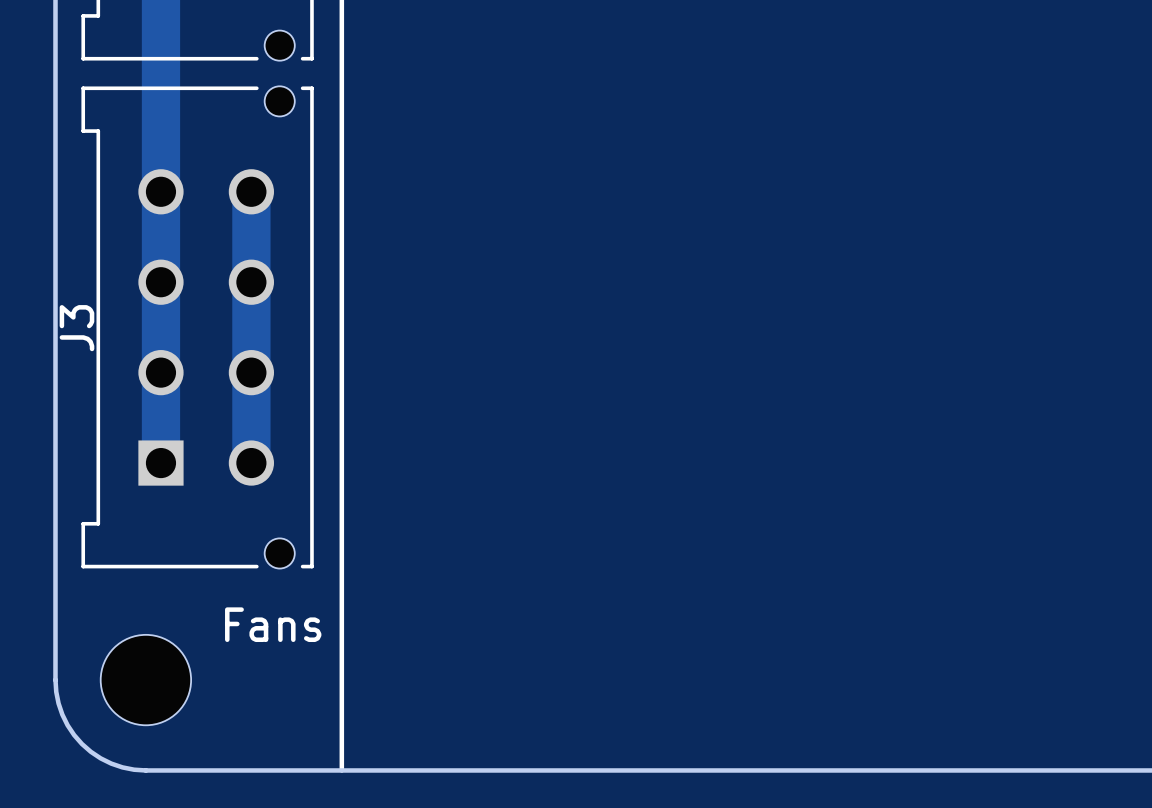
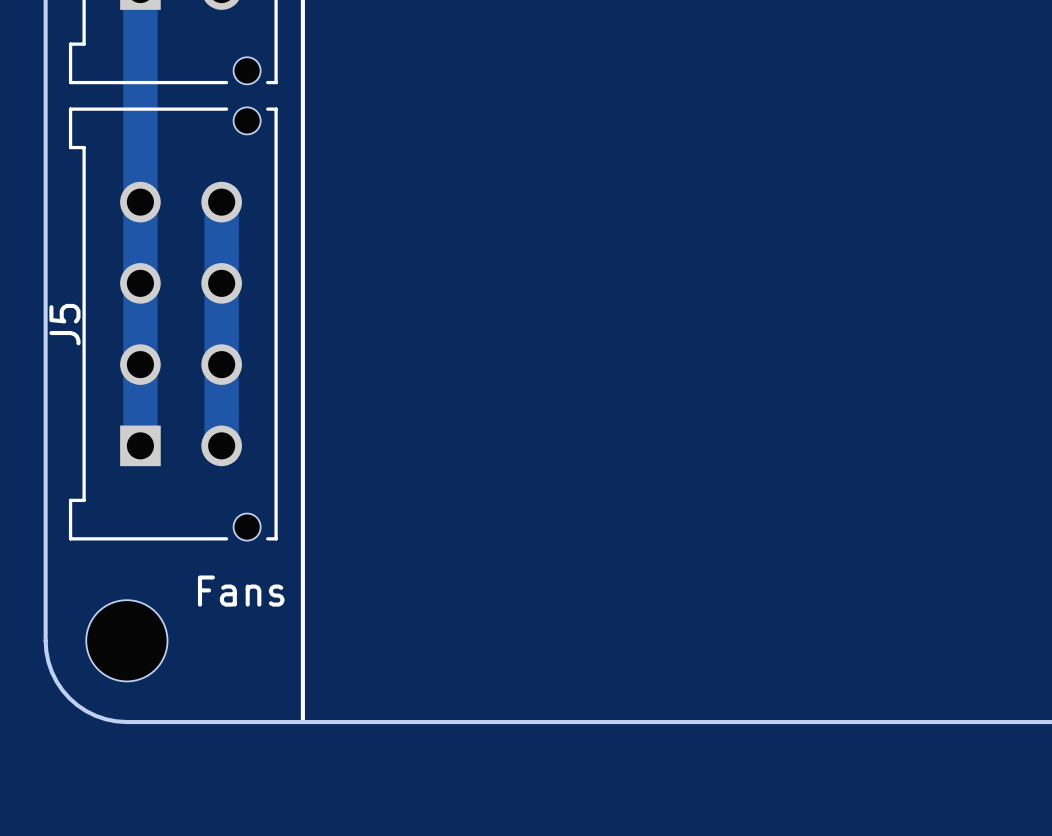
J3 name: J3 (76, 328) -> J5 (64, 324)

